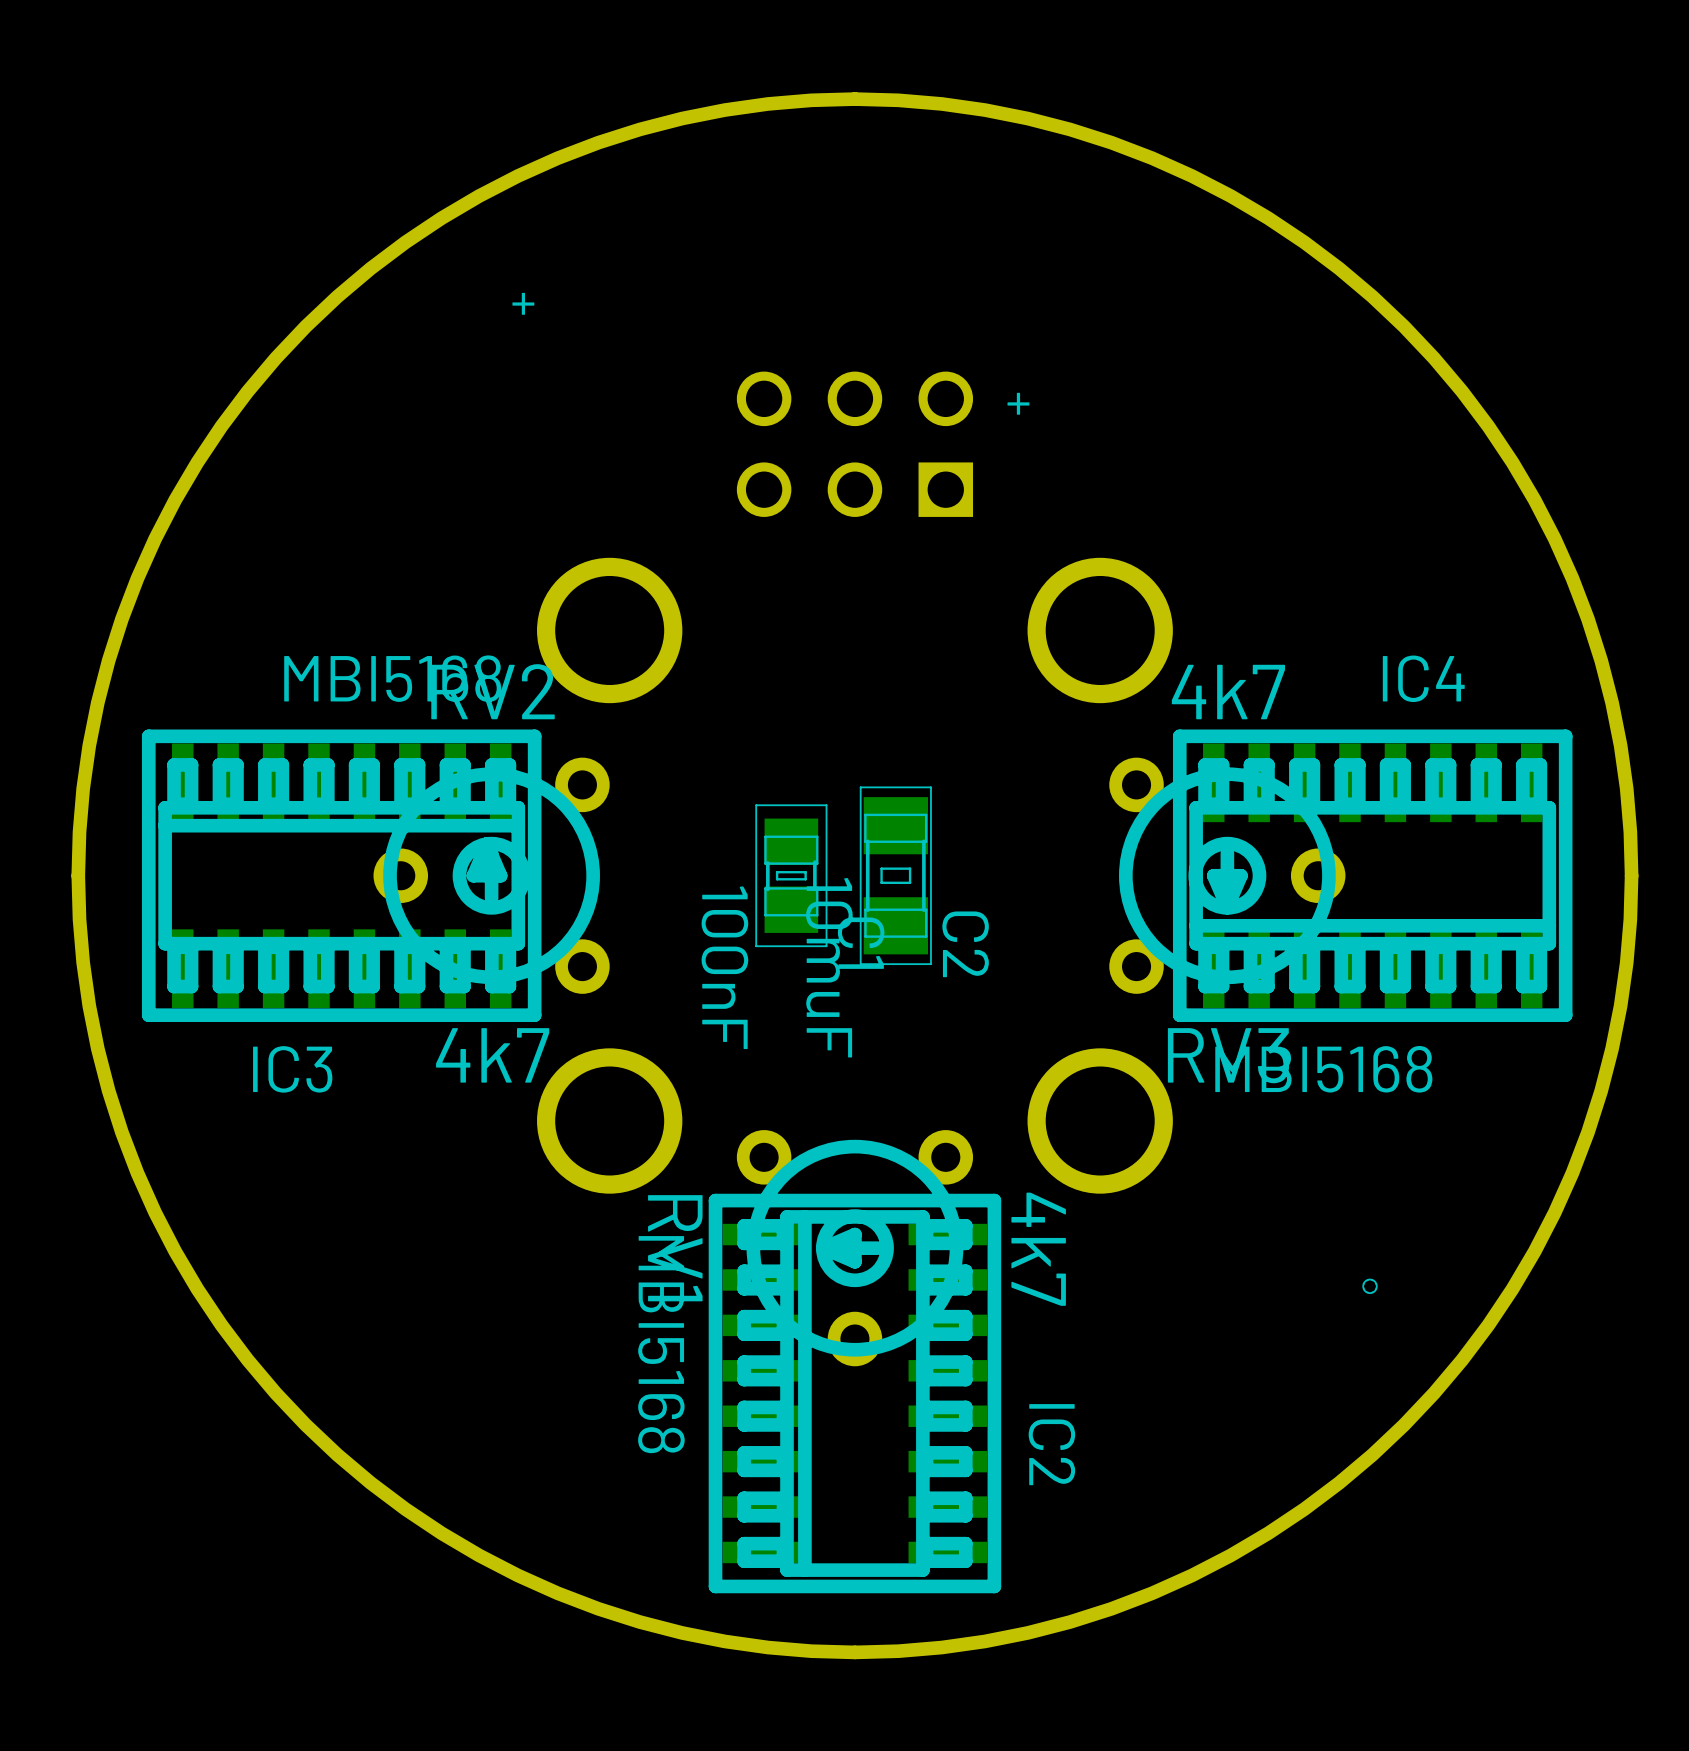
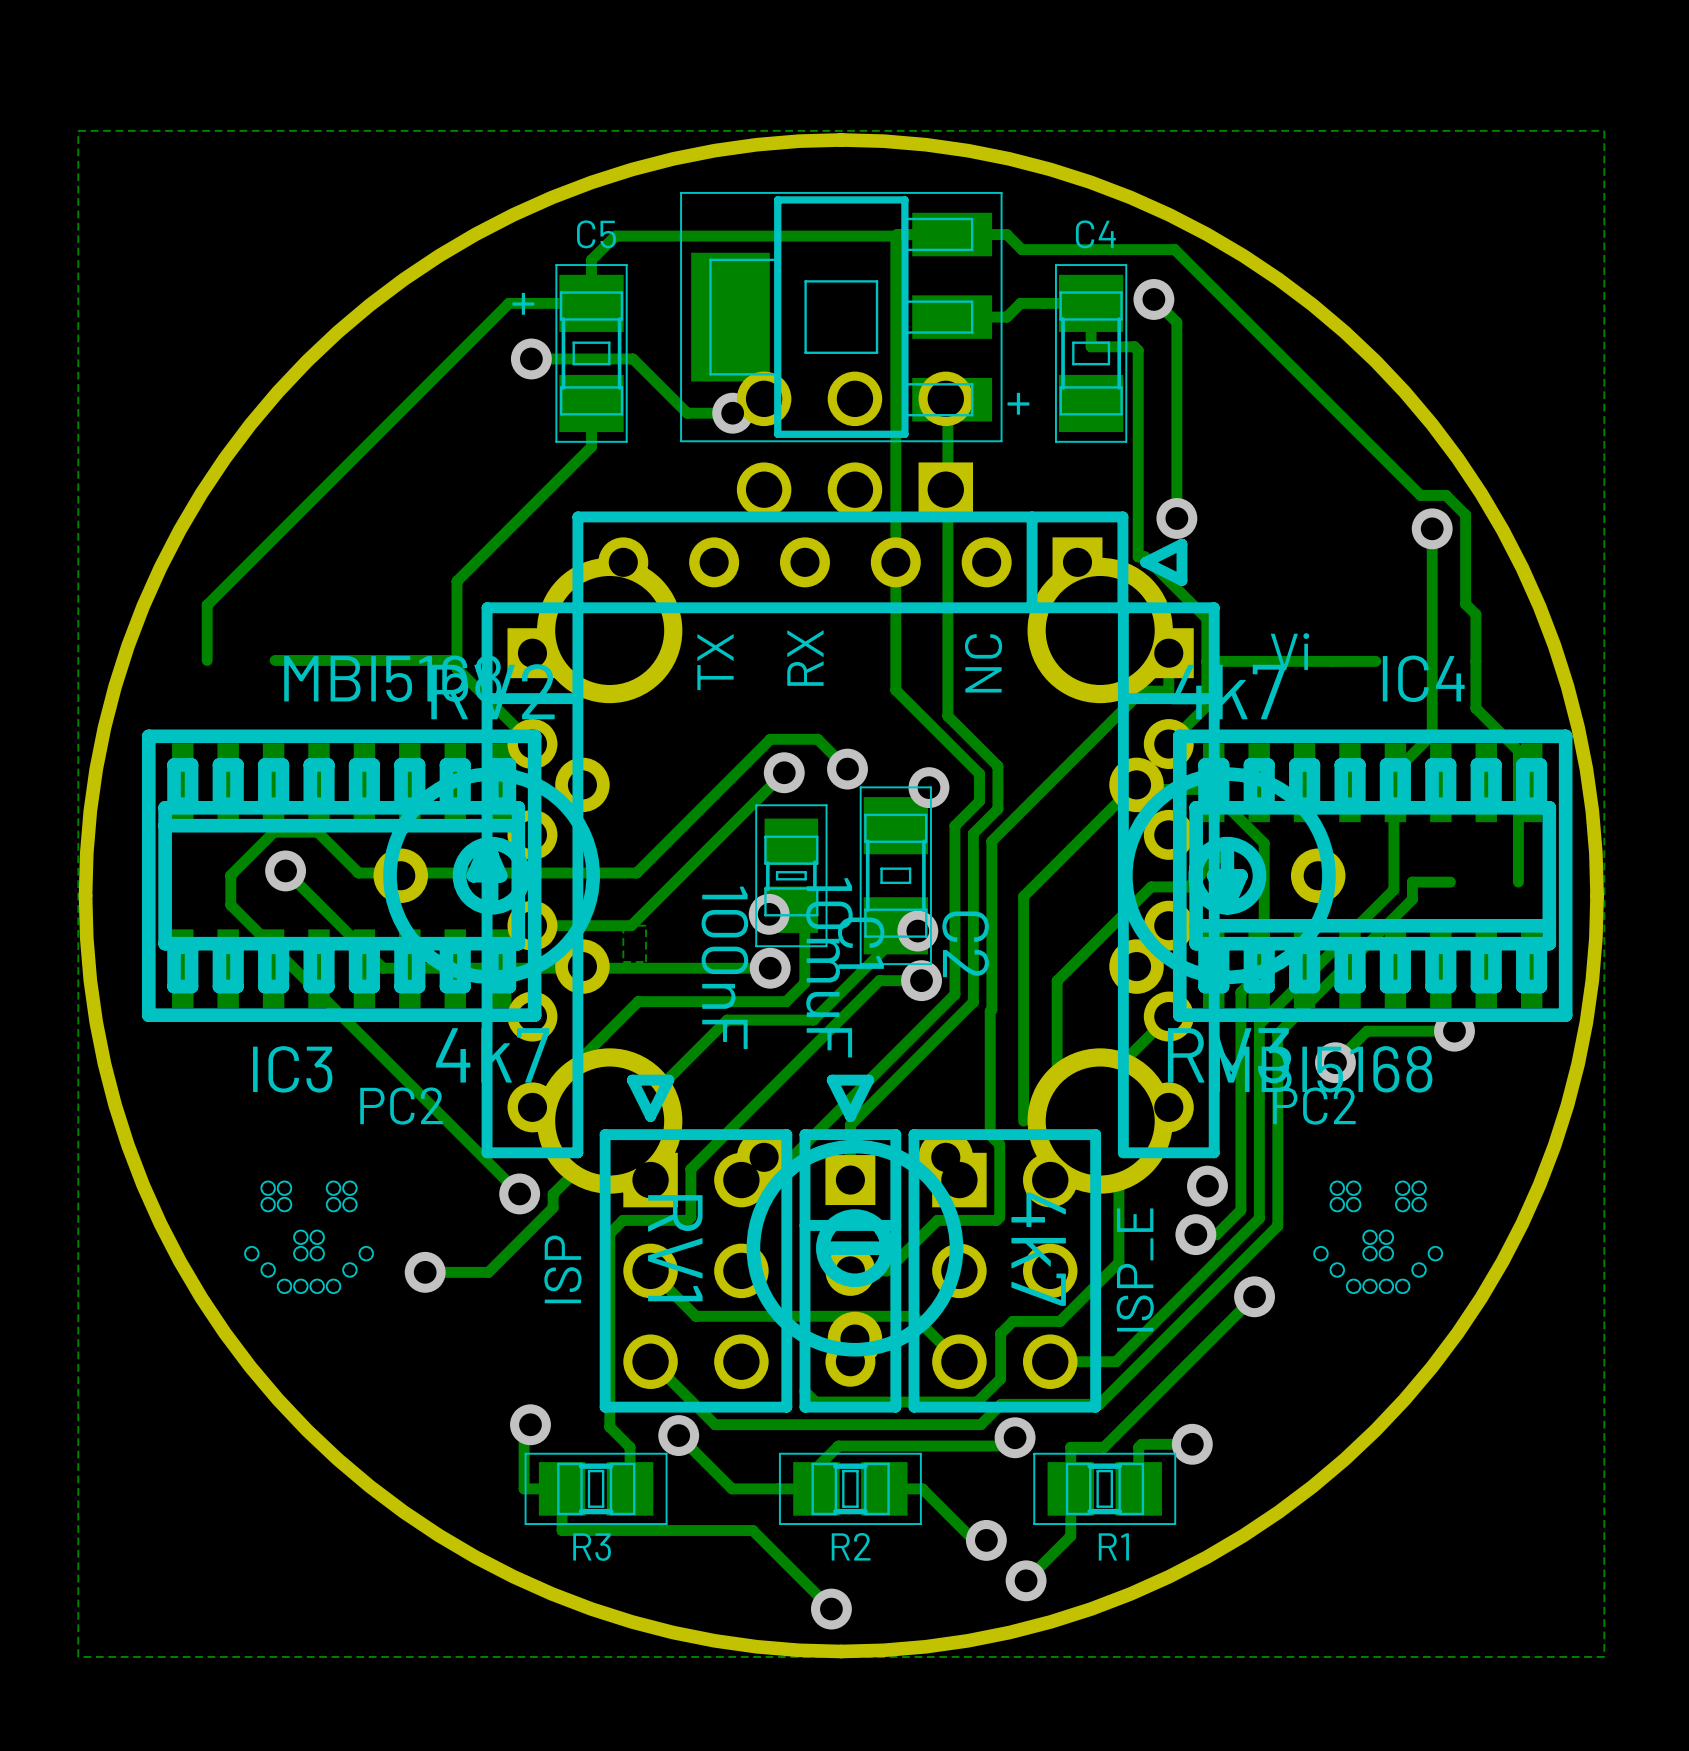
board edge: (854, 99) (941, 103) (1027, 118) (1111, 142) (1152, 158) (1230, 195) (1304, 242) (1372, 296) (1404, 326) (1462, 391) (1512, 462) (1554, 538) (1572, 578) (1588, 619) (1612, 702) (1626, 788) (1631, 875) (1626, 962) (1612, 1048) (1588, 1132) (1572, 1172) (1534, 1251) (1488, 1325) (1462, 1359) (1404, 1424) (1339, 1482) (1268, 1533) (1191, 1575) (1152, 1593) (1111, 1608) (1027, 1632) (941, 1647) (854, 1652) (767, 1647) (682, 1632) (598, 1608) (557, 1593) (479, 1555) (405, 1509) (370, 1482) (305, 1424) (247, 1359) (197, 1288) (155, 1212) (137, 1172) (121, 1132) (97, 1048) (83, 962) (78, 875) (79, 832) (89, 745) (108, 660) (137, 578) (155, 538) (197, 462) (247, 391) (305, 326) (337, 296) (405, 242) (479, 195) (557, 158) (639, 129) (724, 110) (811, 100) (854, 99) -> (841, 139) (925, 144) (1009, 158) (1090, 182) (1130, 197) (1206, 234) (1278, 279) (1344, 332) (1375, 361) (1432, 424) (1457, 458) (1502, 530) (1539, 606) (1554, 646) (1578, 727) (1592, 811) (1597, 895) (1592, 980) (1578, 1063) (1554, 1145) (1539, 1184) (1502, 1261) (1457, 1333) (1404, 1399) (1375, 1430) (1344, 1459) (1278, 1512) (1206, 1557) (1130, 1593) (1050, 1621) (967, 1640) (925, 1646) (841, 1651) (756, 1646) (714, 1640) (632, 1621) (552, 1593) (475, 1557) (403, 1512) (337, 1459) (306, 1430) (277, 1399) (224, 1333) (179, 1261) (143, 1184) (115, 1104) (96, 1022) (90, 980) (85, 895) (86, 853) (96, 769) (115, 686) (143, 606) (179, 530) (224, 458) (277, 392) (306, 361) (370, 304) (439, 255) (475, 234) (552, 197) (591, 182) (673, 158) (756, 144) (841, 139)
zone outline: none -> (1604, 130) (78, 130) (78, 1656) (1604, 1656) (1604, 130)
track: none -> (895, 236) (615, 236) (591, 259) (591, 303) (508, 303) (207, 605) (207, 660)
track: none -> (895, 236) (897, 234) (1006, 234) (1021, 249) (1174, 249) (1420, 495) (1446, 495) (1465, 515) (1465, 604) (1475, 614) (1475, 708) (1518, 750) (1518, 882)
track: none -> (895, 236) (895, 690) (979, 773) (979, 801) (954, 825) (954, 994) (769, 1180) (741, 1180)
track: none -> (1153, 299) (1176, 322) (1176, 518)
via: none -> (1153, 299)
part: none -> (841, 317)
track: none -> (952, 317) (1006, 317) (1020, 303) (1091, 303) (1091, 346) (1134, 346) (1138, 350) (1138, 556) (1144, 556) (1206, 618) (1206, 705) (1168, 744)
C5: none -> (591, 353)
C4: none -> (1091, 353)
track: none -> (531, 358) (633, 358) (687, 413) (732, 413)
via: none -> (531, 358)
track: none -> (952, 399) (952, 403) (947, 407) (947, 716) (997, 766) (997, 809) (973, 833) (973, 1002) (850, 1125) (850, 1180)
track: none -> (591, 403) (591, 446) (456, 581) (456, 668) (532, 744)
via: none -> (732, 413)
via: none -> (1176, 518)
track: none -> (1432, 528) (1432, 734) (1393, 772) (1393, 889) (1259, 1024) (1259, 1218) (1116, 1361) (1050, 1361)
via: none -> (1432, 528)
part: none -> (879, 562)
text: none -> Vi (1290, 651)
track: none -> (1168, 653) (1168, 691) (1141, 691) (991, 841) (990, 1135) (999, 1144) (999, 1217) (996, 1220) (937, 1220) (887, 1270) (850, 1270)
text: none -> RX (805, 658)
track: none -> (456, 660) (275, 660)
track: none -> (1375, 661) (1206, 661)
text: none -> TX (715, 662)
text: none -> NC (983, 663)
track: none -> (847, 769) (817, 739) (770, 739) (636, 873) (358, 873) (317, 832) (273, 832) (230, 875) (230, 905) (519, 1193)
via: none -> (847, 769)
track: none -> (784, 772) (631, 925) (532, 925)
via: none -> (784, 772)
via: none -> (928, 787)
track: none -> (1224, 851) (1188, 886) (1151, 886) (1057, 980) (1057, 1173) (1050, 1180)
track: none -> (285, 870) (382, 968) (770, 968)
via: none -> (285, 870)
part: none -> (532, 880)
part: none -> (1168, 880)
track: none -> (1450, 882) (1412, 882) (1412, 899) (1277, 1034) (1277, 1226) (1099, 1404) (1001, 1404) (980, 1424) (715, 1424) (650, 1361)
track: none -> (769, 914) (804, 914) (804, 983) (786, 1001) (638, 1001) (532, 1107)
via: none -> (769, 914)
zone outline: none -> (646, 925) (646, 962) (623, 962) (623, 925) (646, 925)
track: none -> (917, 931) (902, 931) (813, 1020) (727, 1020) (553, 1194) (553, 1207) (488, 1272) (425, 1272)
via: none -> (917, 931)
via: none -> (770, 968)
track: none -> (921, 980) (879, 980) (690, 1169) (690, 1217) (687, 1220) (623, 1220) (609, 1233) (609, 1427) (630, 1447) (630, 1488)
via: none -> (921, 980)
track: none -> (1168, 1016) (1118, 1066) (1118, 1262) (1060, 1321) (1013, 1321) (1000, 1333) (1000, 1378) (977, 1402) (815, 1402) (804, 1391)
track: none -> (1454, 1031) (1366, 1031) (1335, 1062)
via: none -> (1454, 1031)
via: none -> (1335, 1062)
text: none -> PC2 (401, 1106)
text: none -> PC2 (1314, 1106)
track: none -> (1023, 1121) (1023, 896) (1130, 789) (1210, 789) (1264, 843) (1264, 969) (1240, 992) (1240, 1210) (1216, 1234) (1195, 1234)
drawing: none -> [244, 1180, 374, 1295]
drawing: none -> [1313, 1180, 1444, 1295]
via: none -> (1207, 1186)
via: none -> (519, 1193)
via: none -> (1195, 1234)
part: none -> (695, 1243)
part: none -> (850, 1243)
text: none -> ISP (562, 1269)
text: none -> ISP_E (1135, 1269)
track: none -> (650, 1270) (695, 1316) (913, 1316) (959, 1361)
part: none -> (1004, 1270)
via: none -> (425, 1272)
track: none -> (1254, 1296) (1104, 1447) (1070, 1447) (1070, 1536) (1026, 1580)
via: none -> (1254, 1296)
IC2: MBI5168 (854, 1393) -> none
track: none -> (530, 1424) (524, 1431) (524, 1488) (562, 1488) (562, 1530) (752, 1530) (831, 1609)
via: none -> (530, 1424)
track: none -> (678, 1435) (732, 1488) (816, 1488) (816, 1468) (838, 1446) (1006, 1446) (1015, 1437)
via: none -> (678, 1435)
via: none -> (1015, 1437)
track: none -> (1192, 1444) (1141, 1444) (1138, 1447) (1138, 1488)
via: none -> (1192, 1444)
R3: none -> (596, 1488)
R2: none -> (850, 1488)
track: none -> (884, 1488) (922, 1488) (973, 1540) (986, 1540)
R1: none -> (1104, 1488)
via: none -> (986, 1540)
via: none -> (1026, 1580)
via: none -> (831, 1609)

